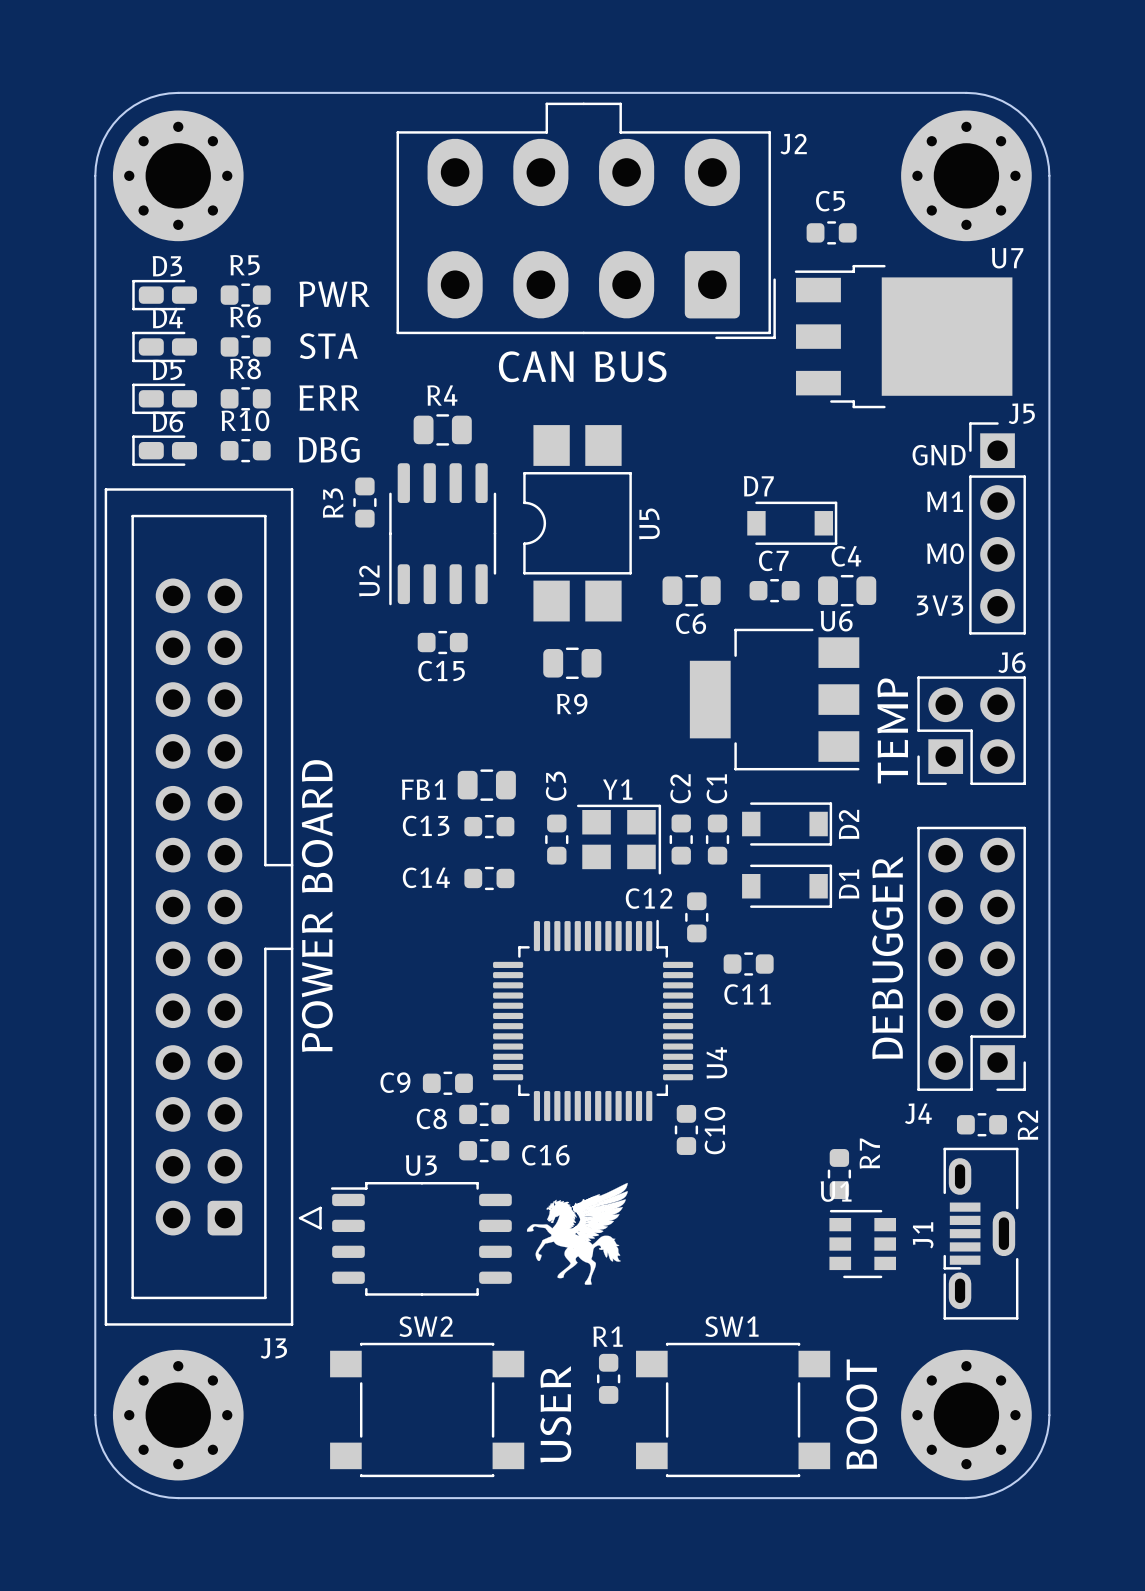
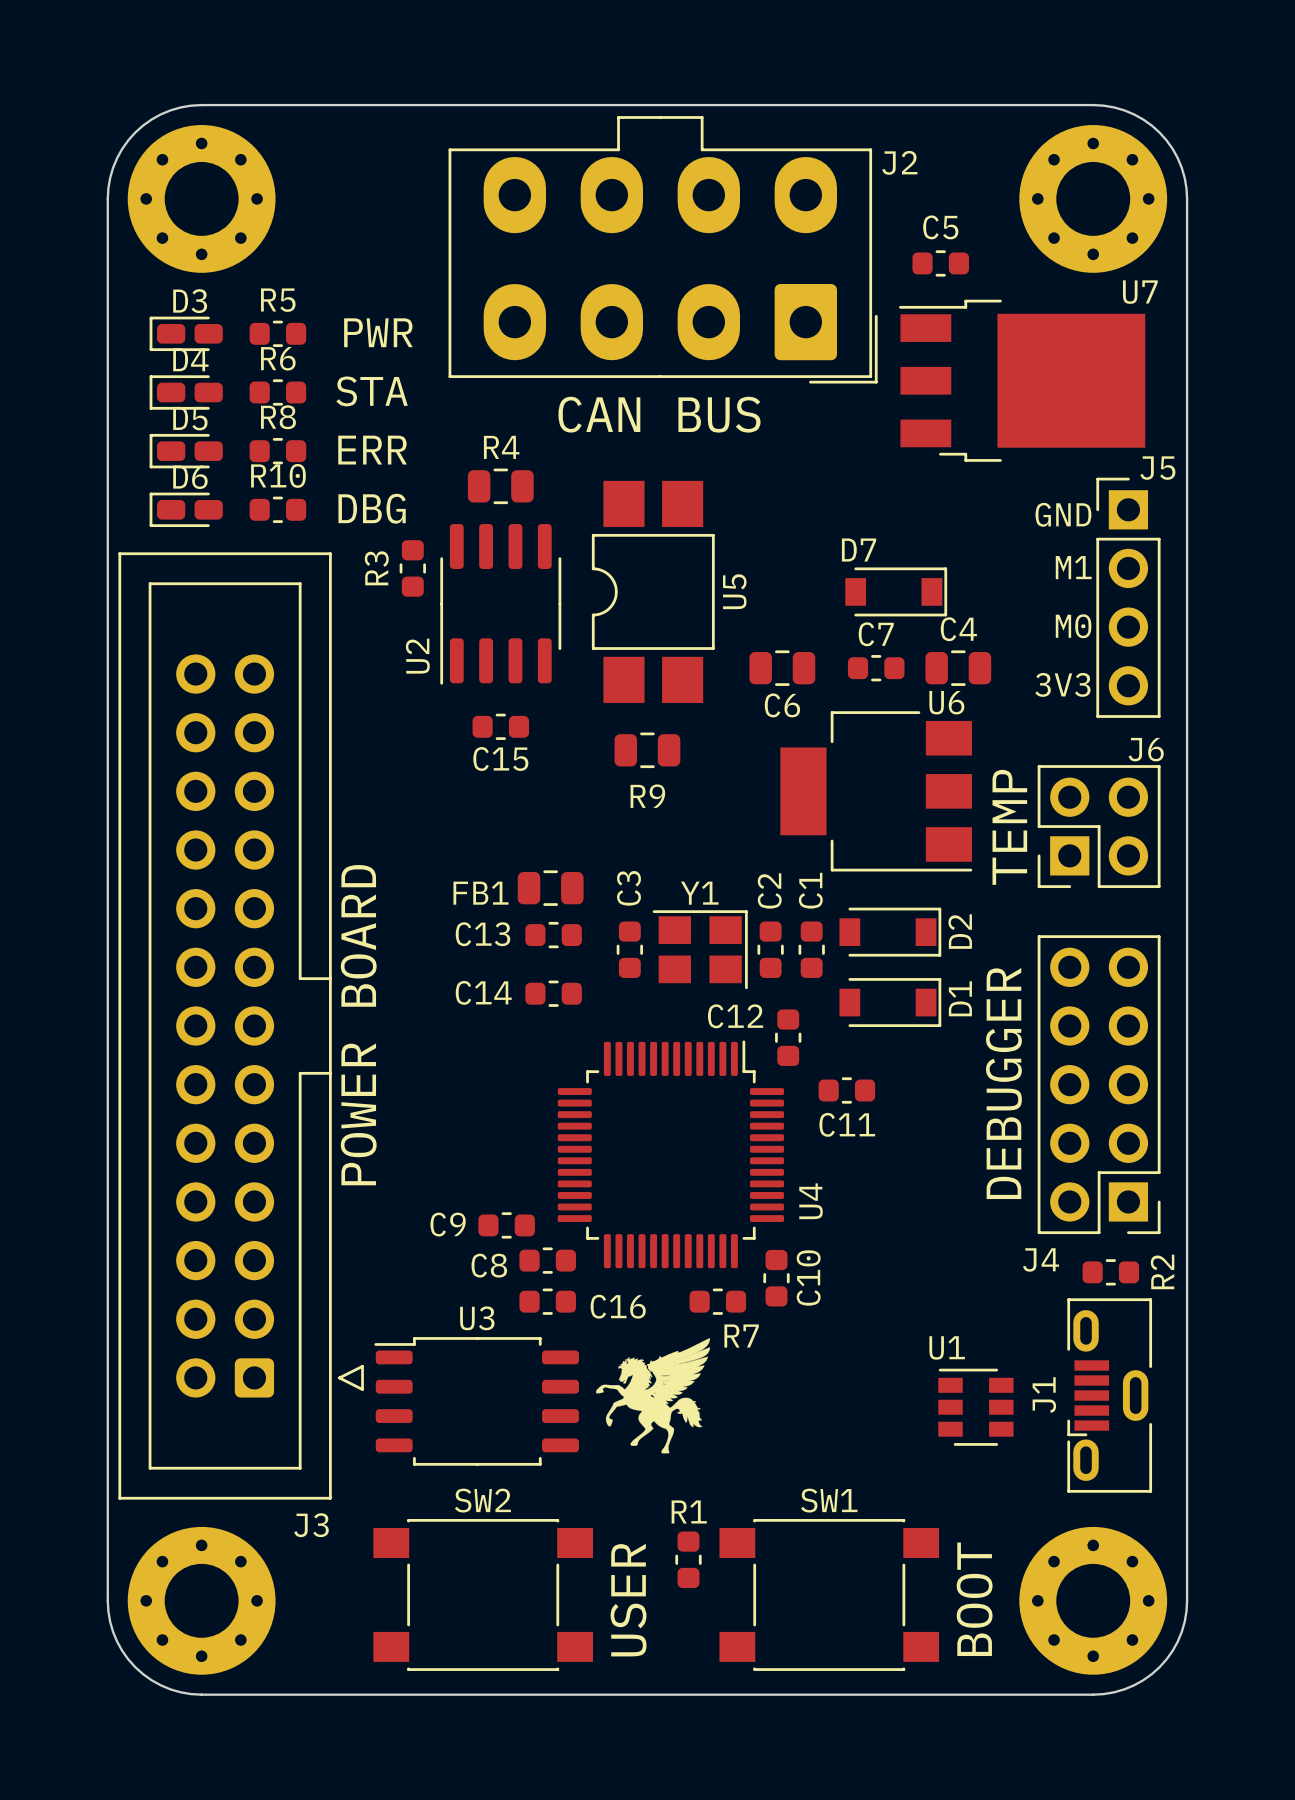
R7 rotation: 0° (839, 1174) -> 90° clockwise (717, 1301)
R7 position: (839, 1174) -> (717, 1301)

